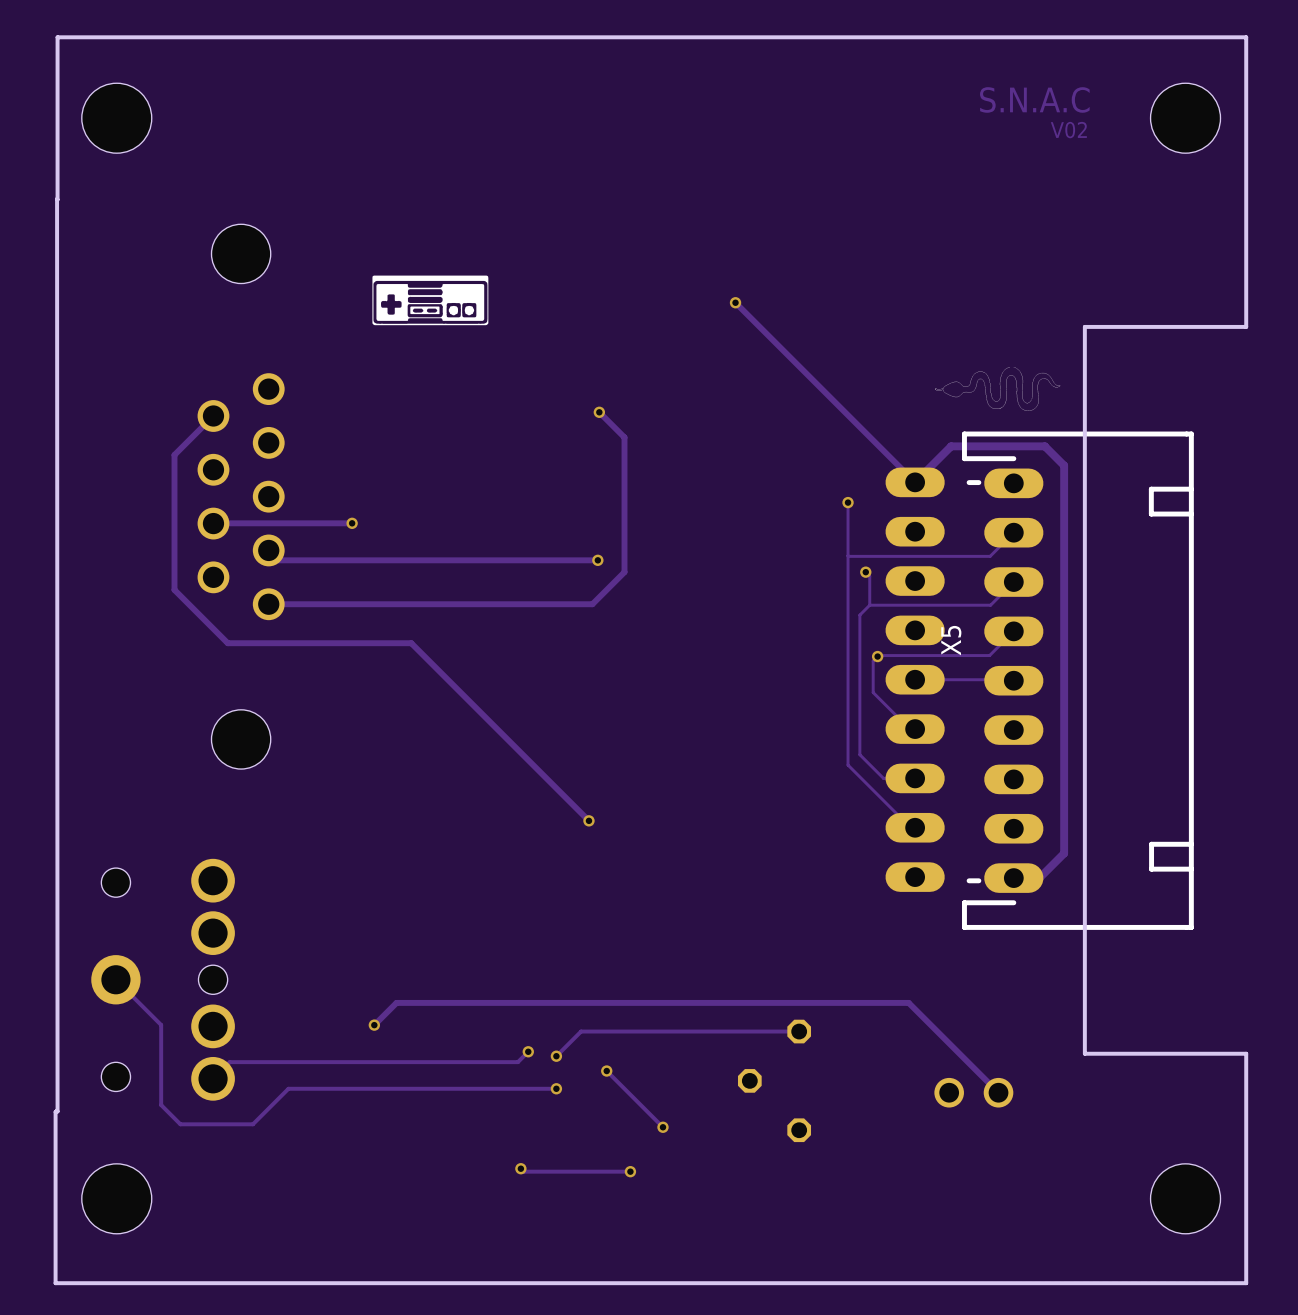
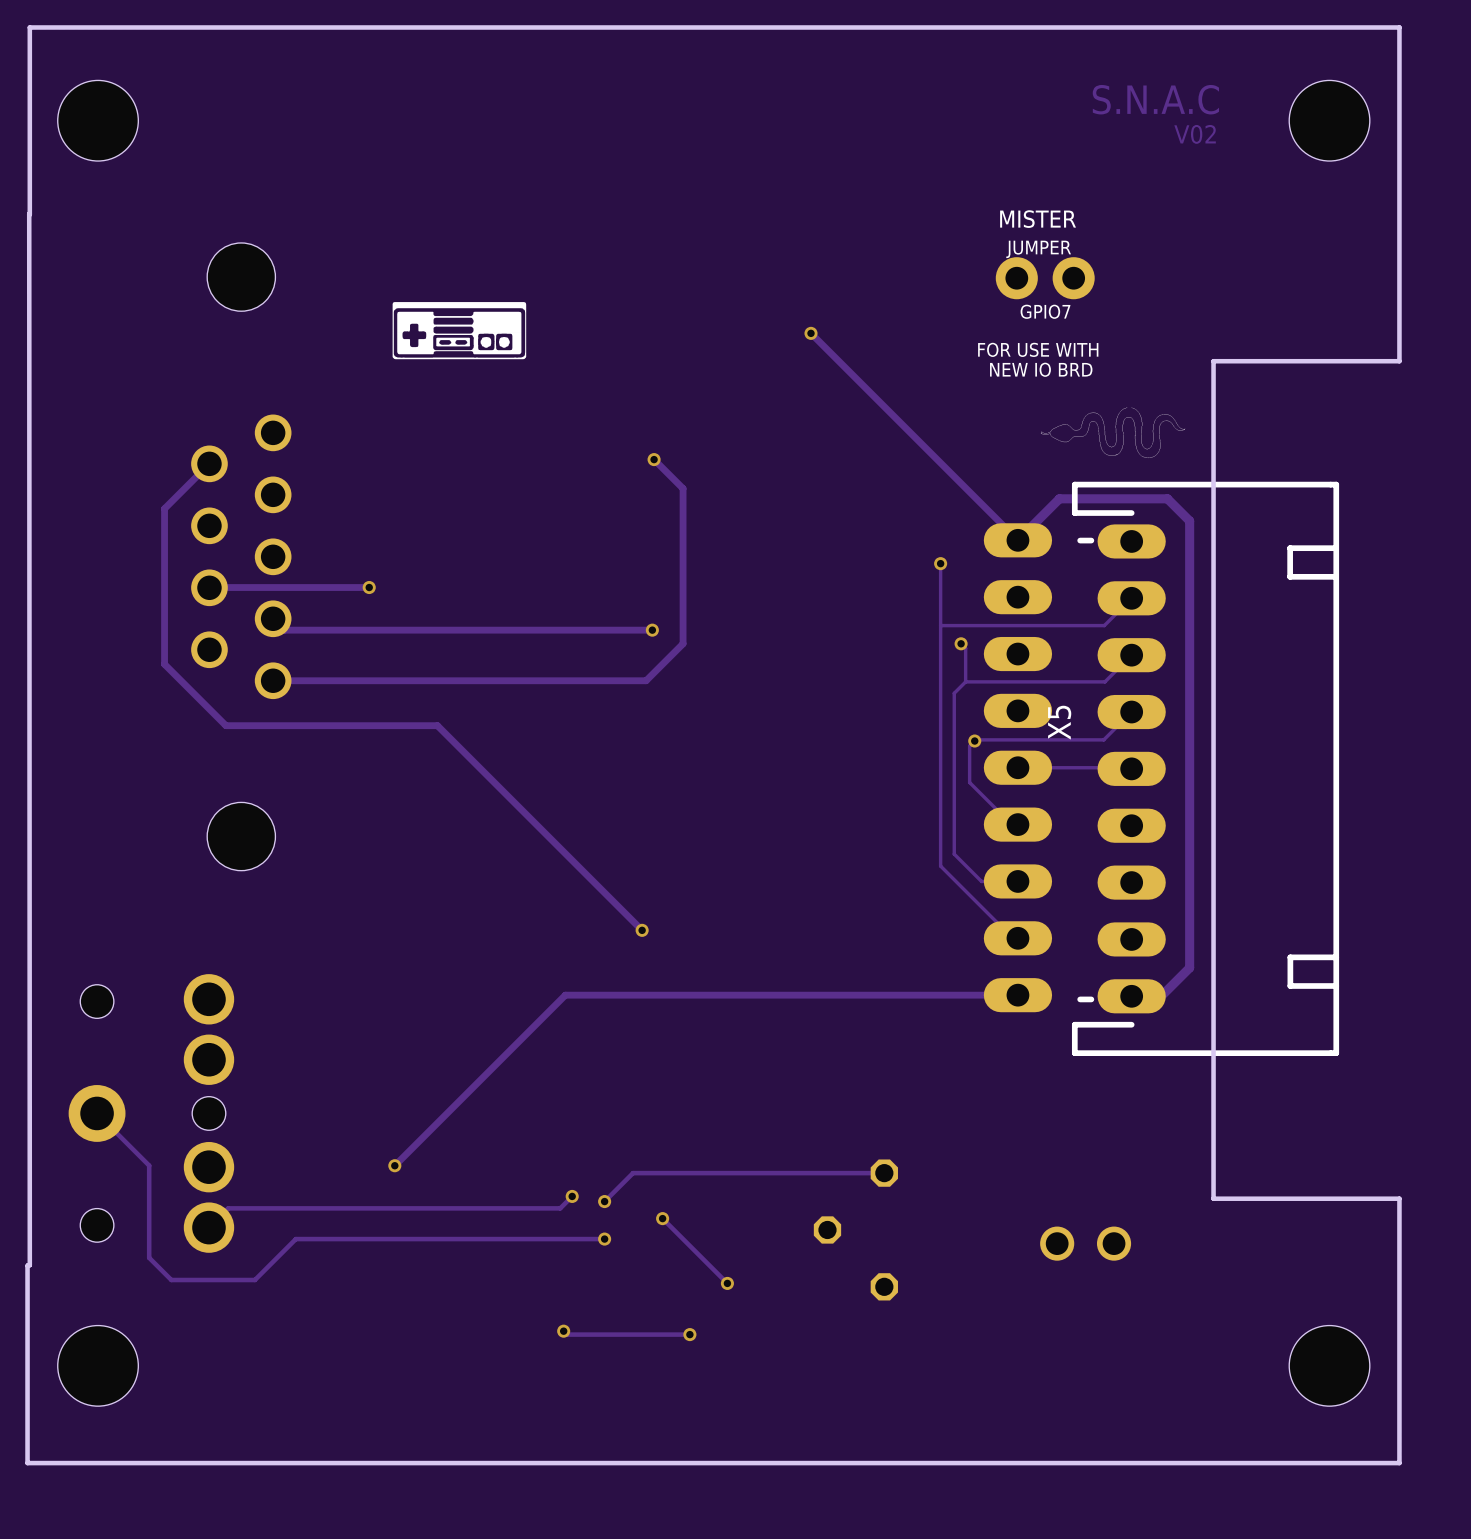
text: none -> MISTER (1038, 219)
text: none -> JUMPER (1038, 249)
part: none -> (1045, 278)
text: none -> GPIO7 (1045, 311)
text: none -> FOR USE WITH (1038, 349)
text: none -> NEW IO BRD (1041, 369)
track: (396, 1002) (908, 1002) (998, 1092) -> (420, 1140) (565, 995) (1017, 995)

